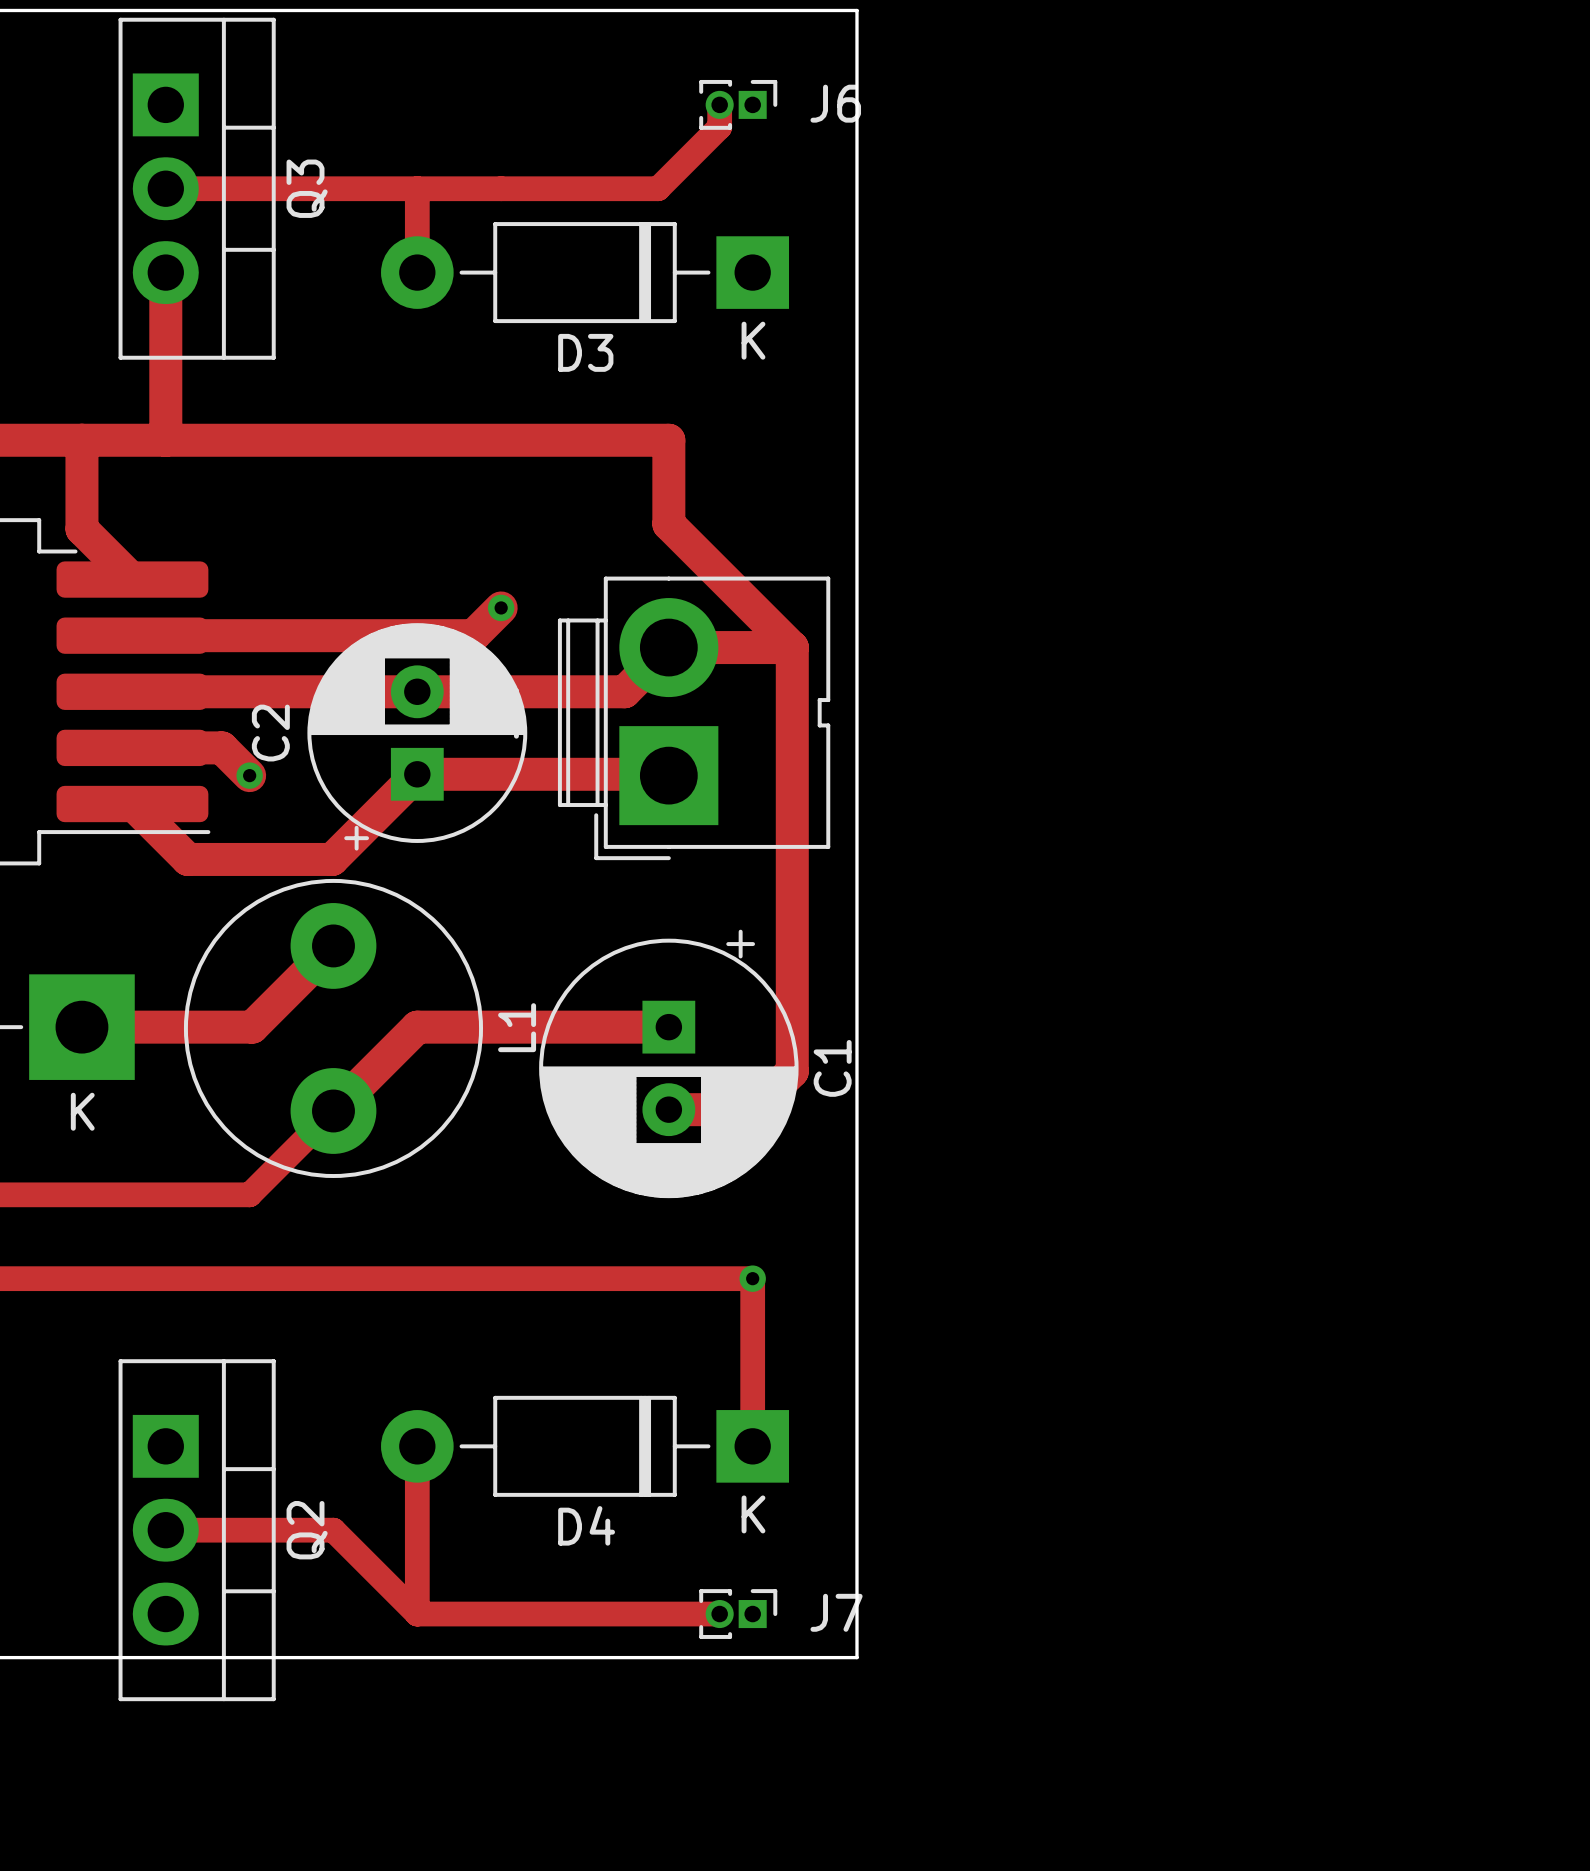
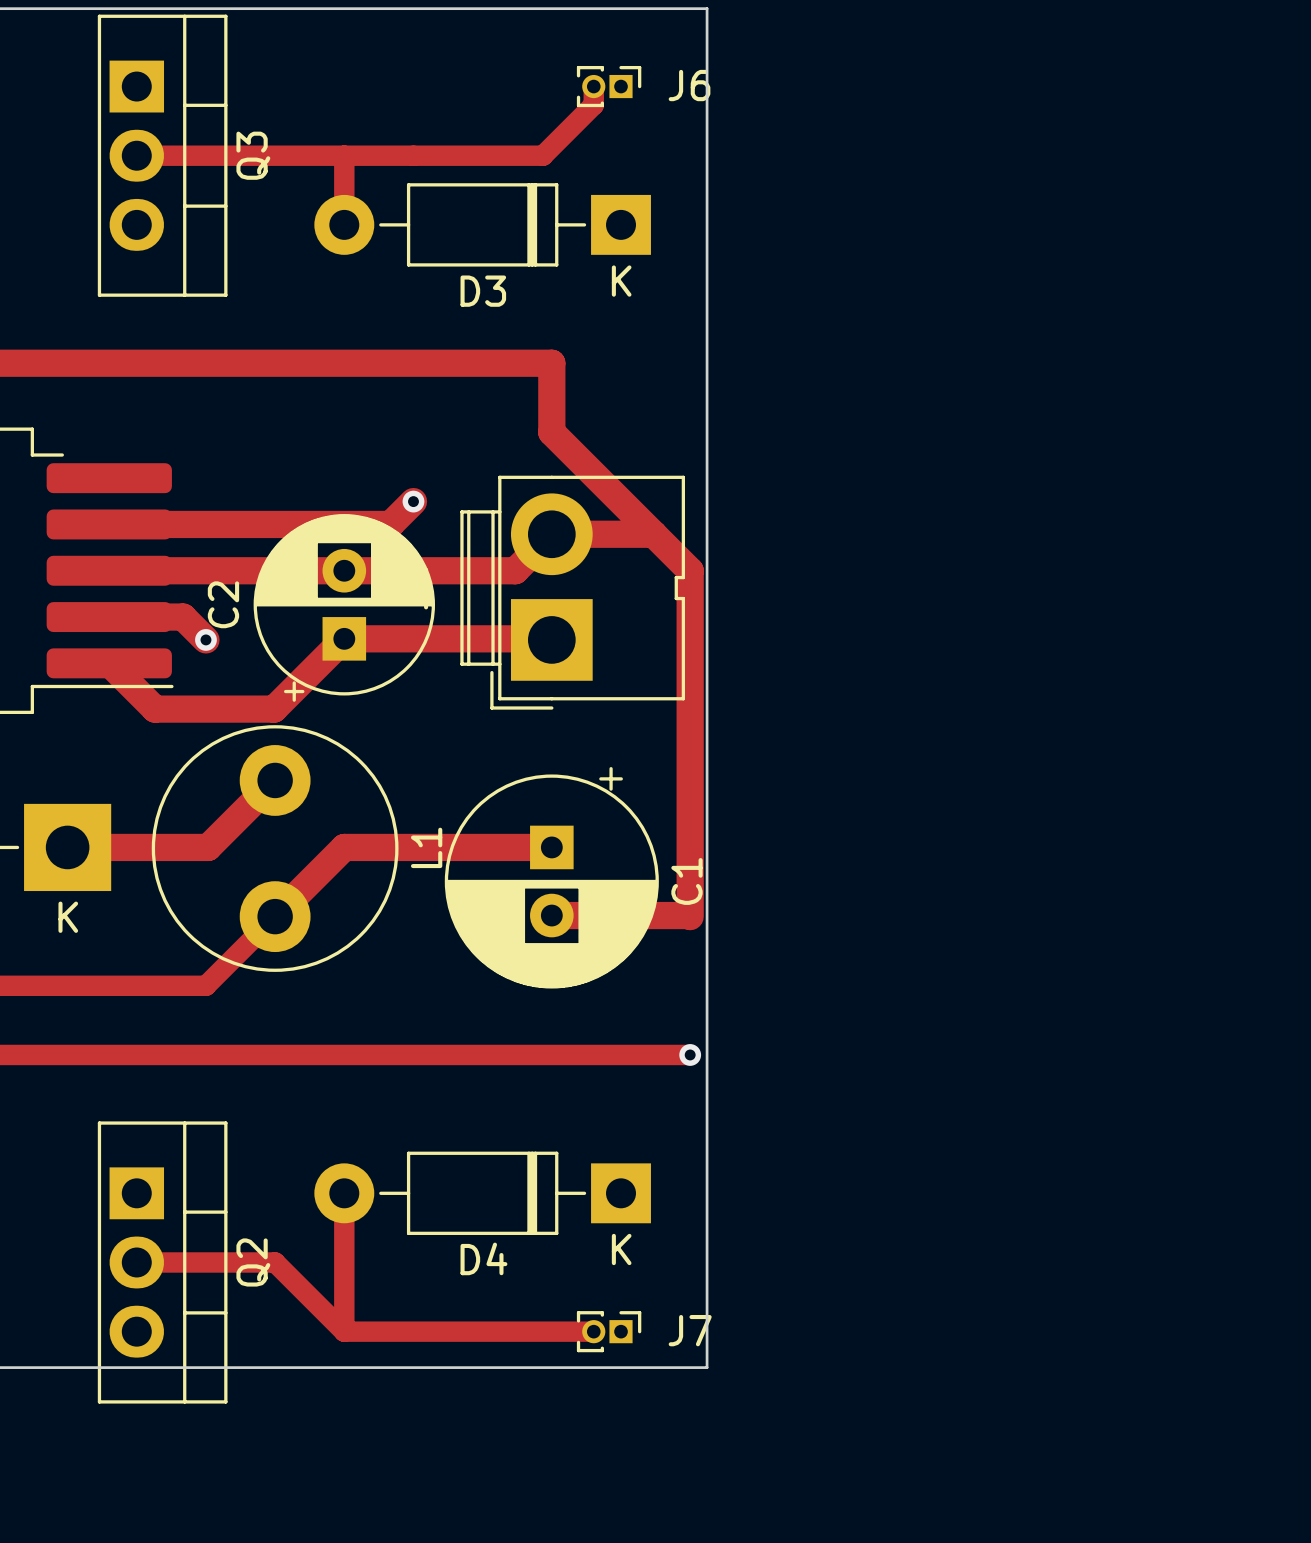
track: (165, 272) (165, 440) -> none
track: (81, 440) (81, 529) (132, 579) -> none
track: (792, 647) (792, 1071) (752, 1110) (751, 1109) -> (653, 534) (690, 570) (690, 916) (619, 915)
track: (752, 1278) (752, 1446) -> (621, 1054) (690, 1054)
via position: (752, 1278) -> (690, 1054)

